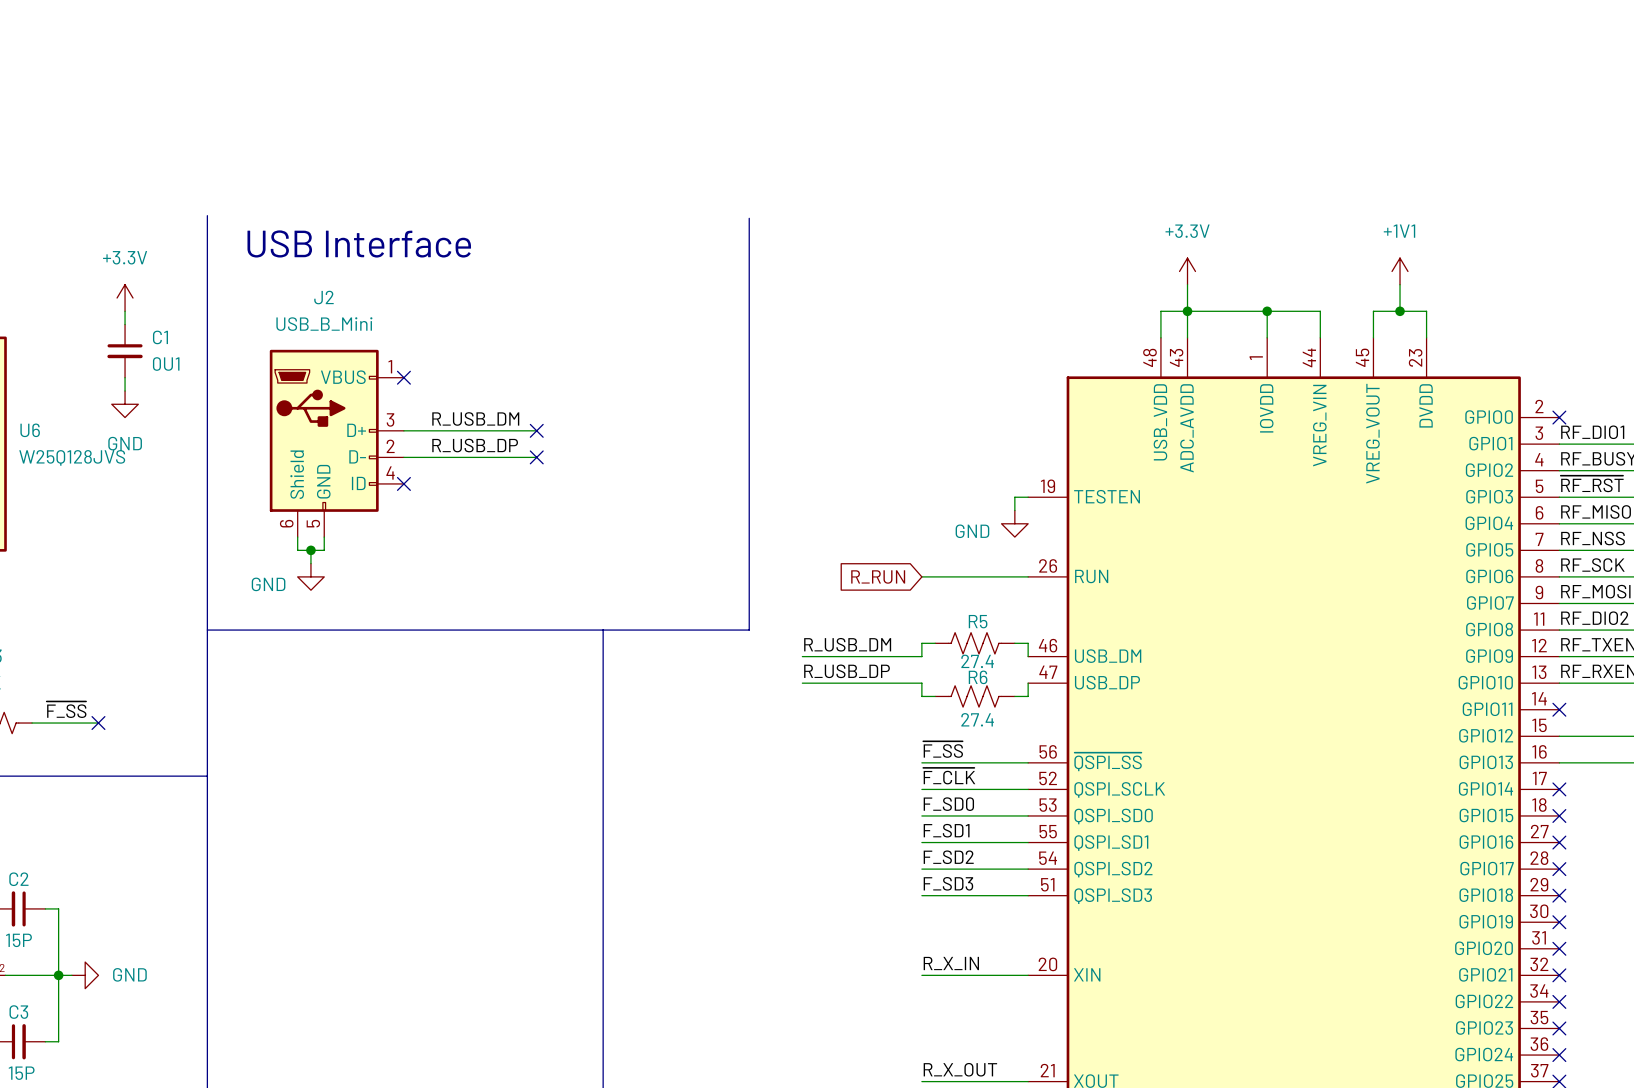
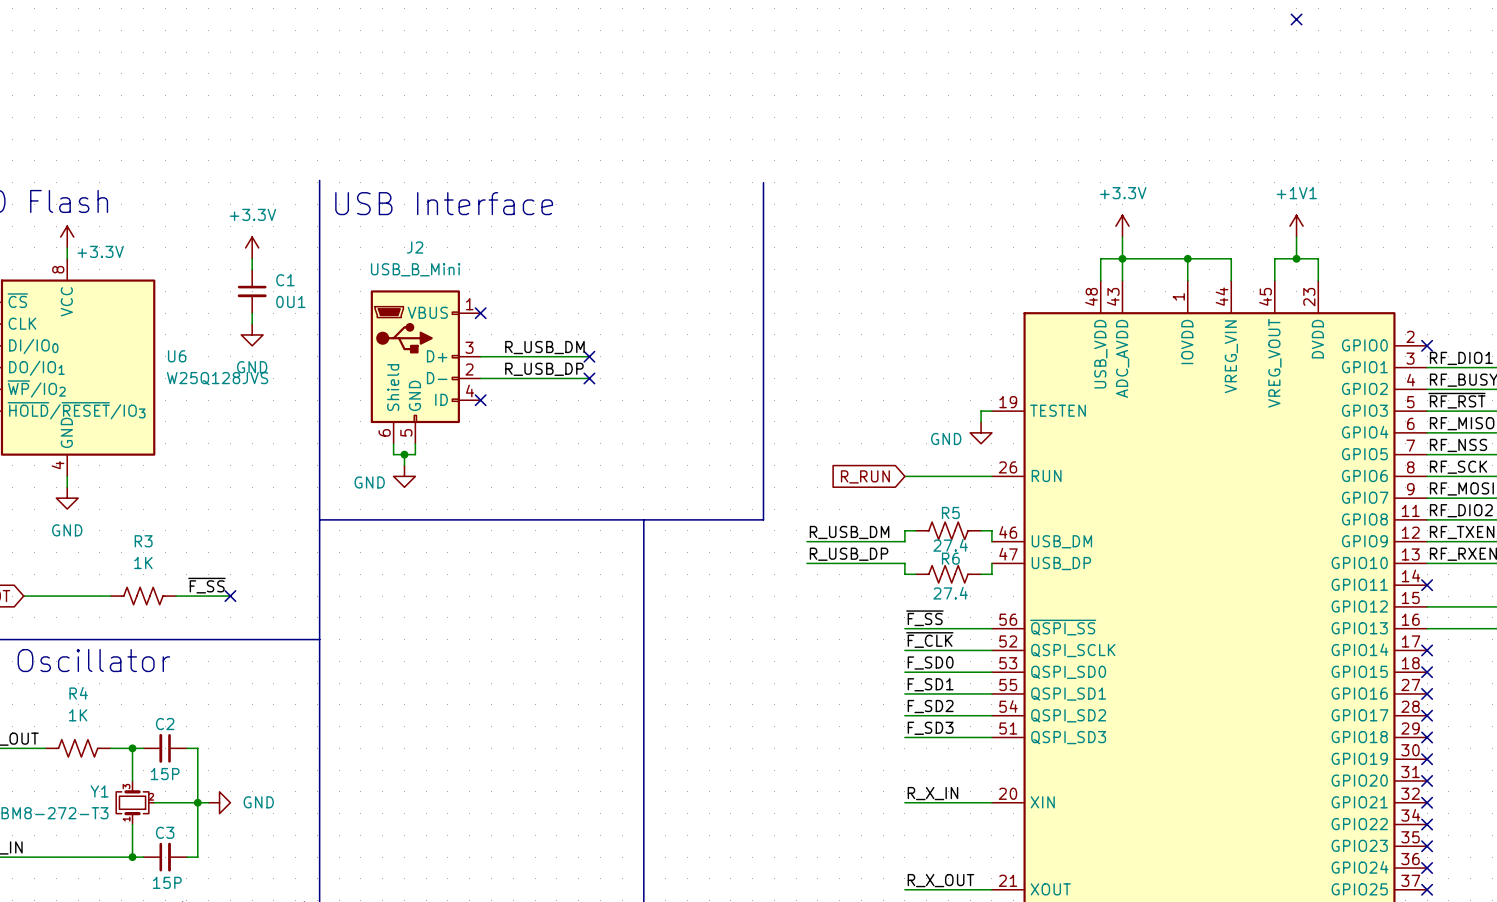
no-connect mark: none -> (1296, 19)

